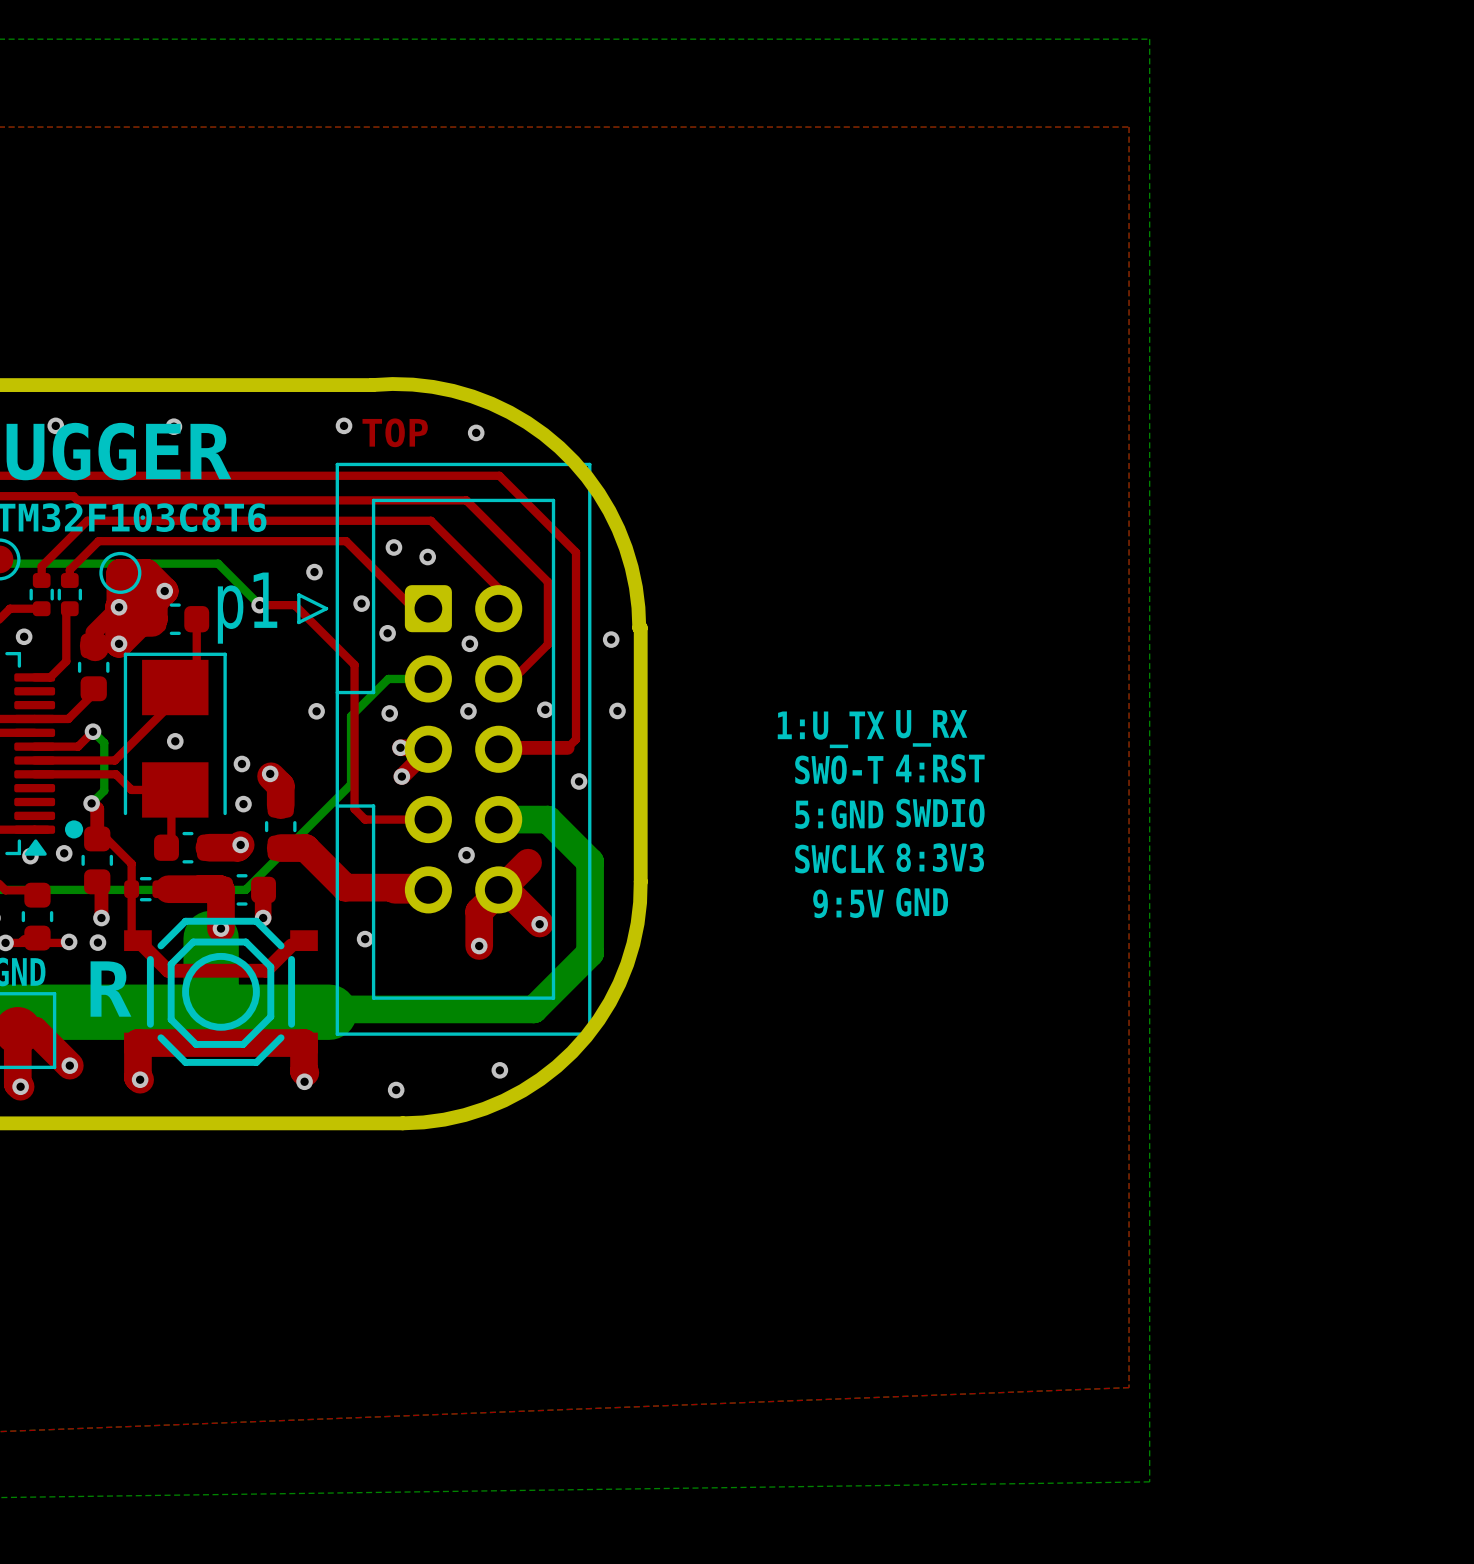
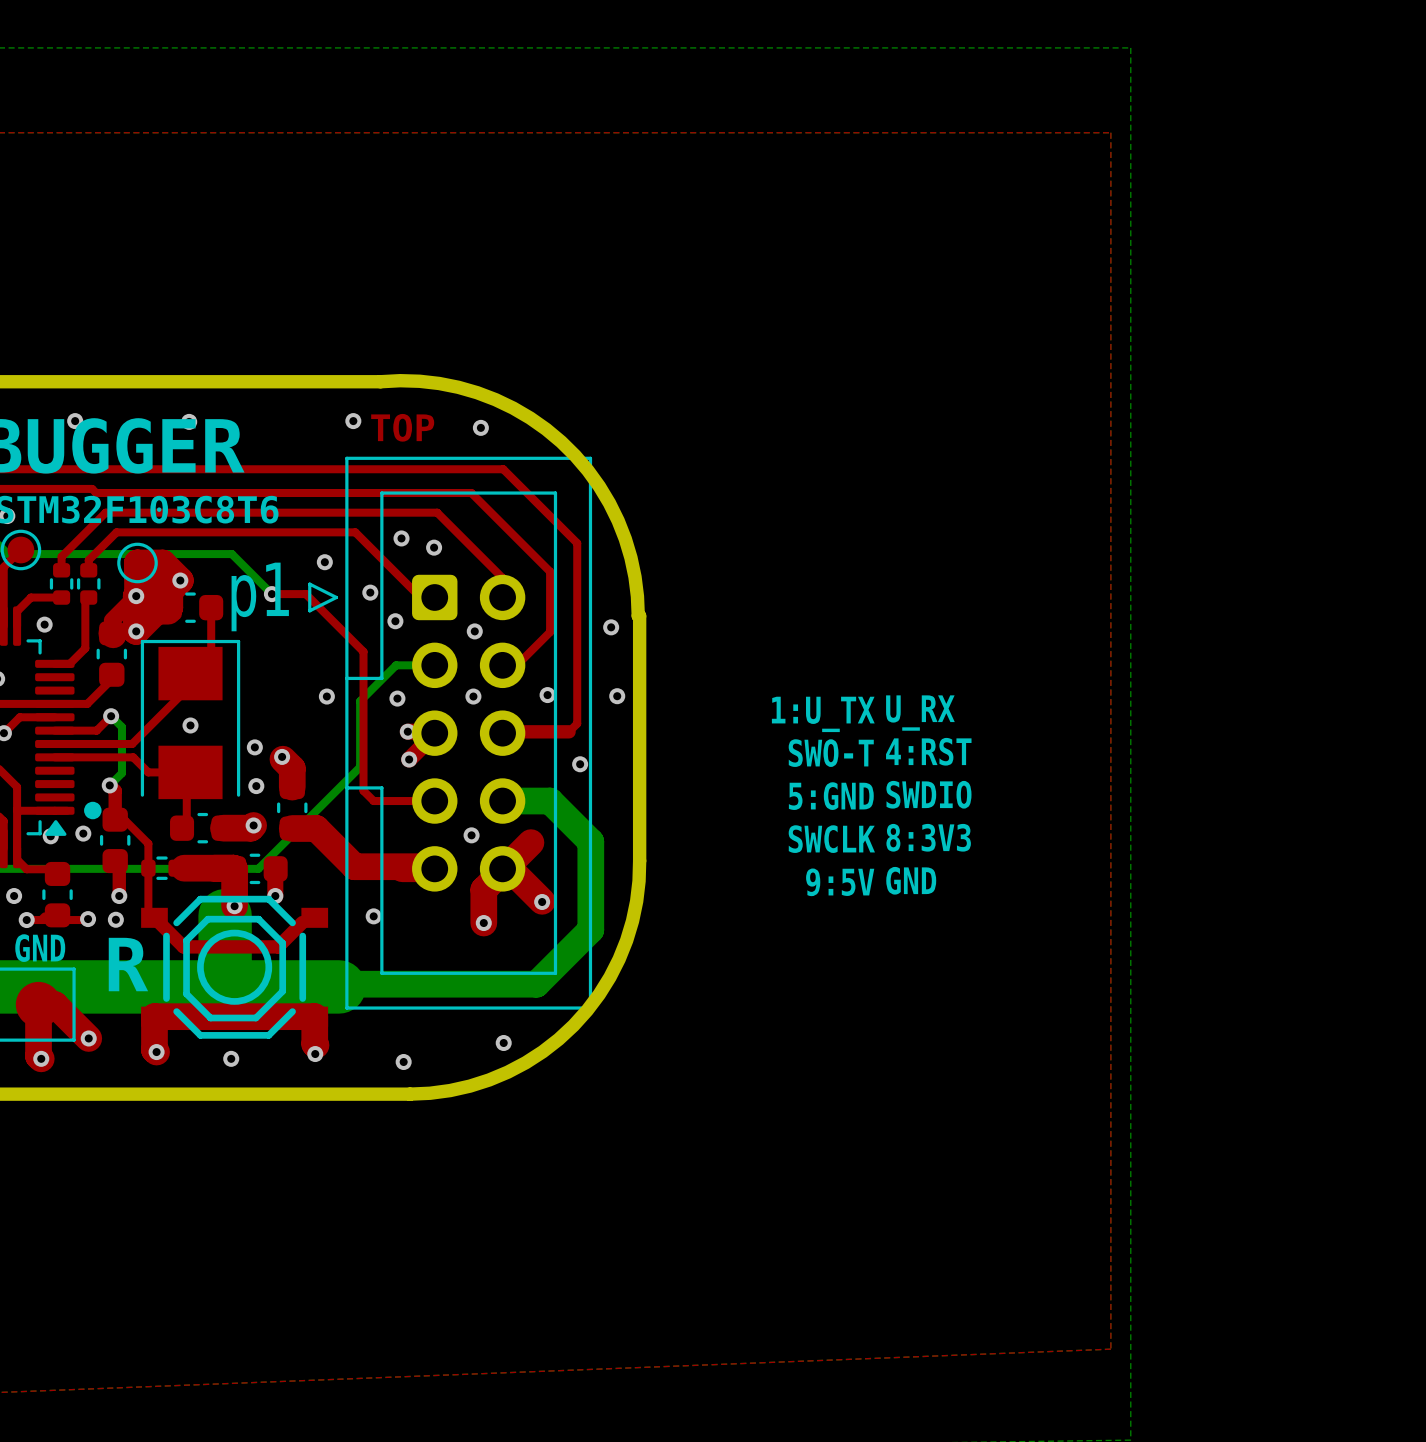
via: none -> (231, 1058)

